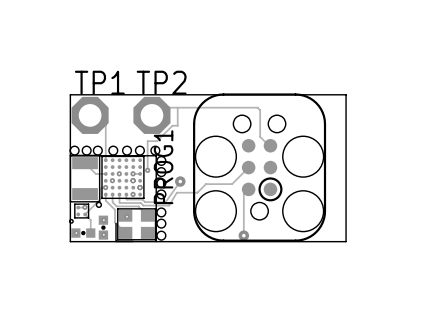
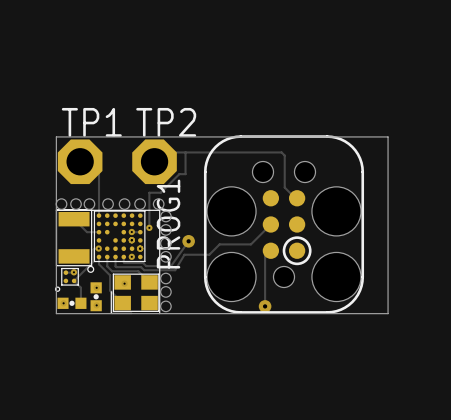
via: (119, 173) -> none
via: (112, 180) -> none

